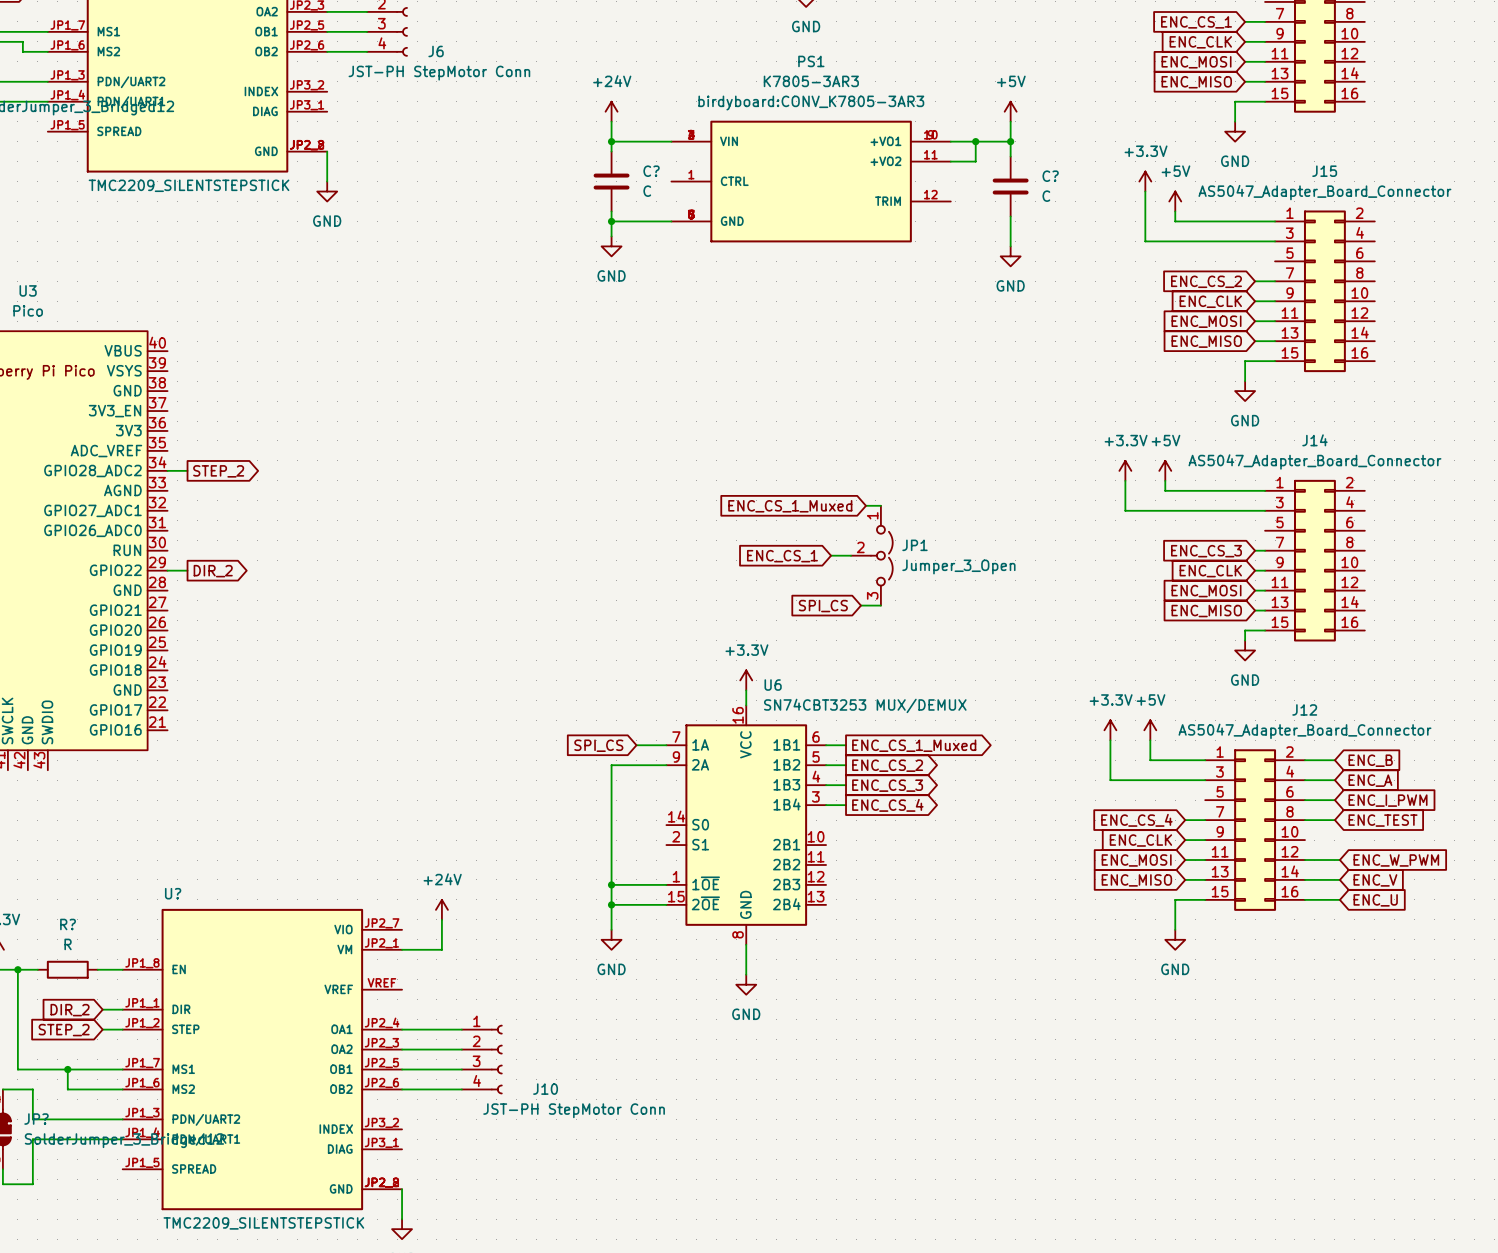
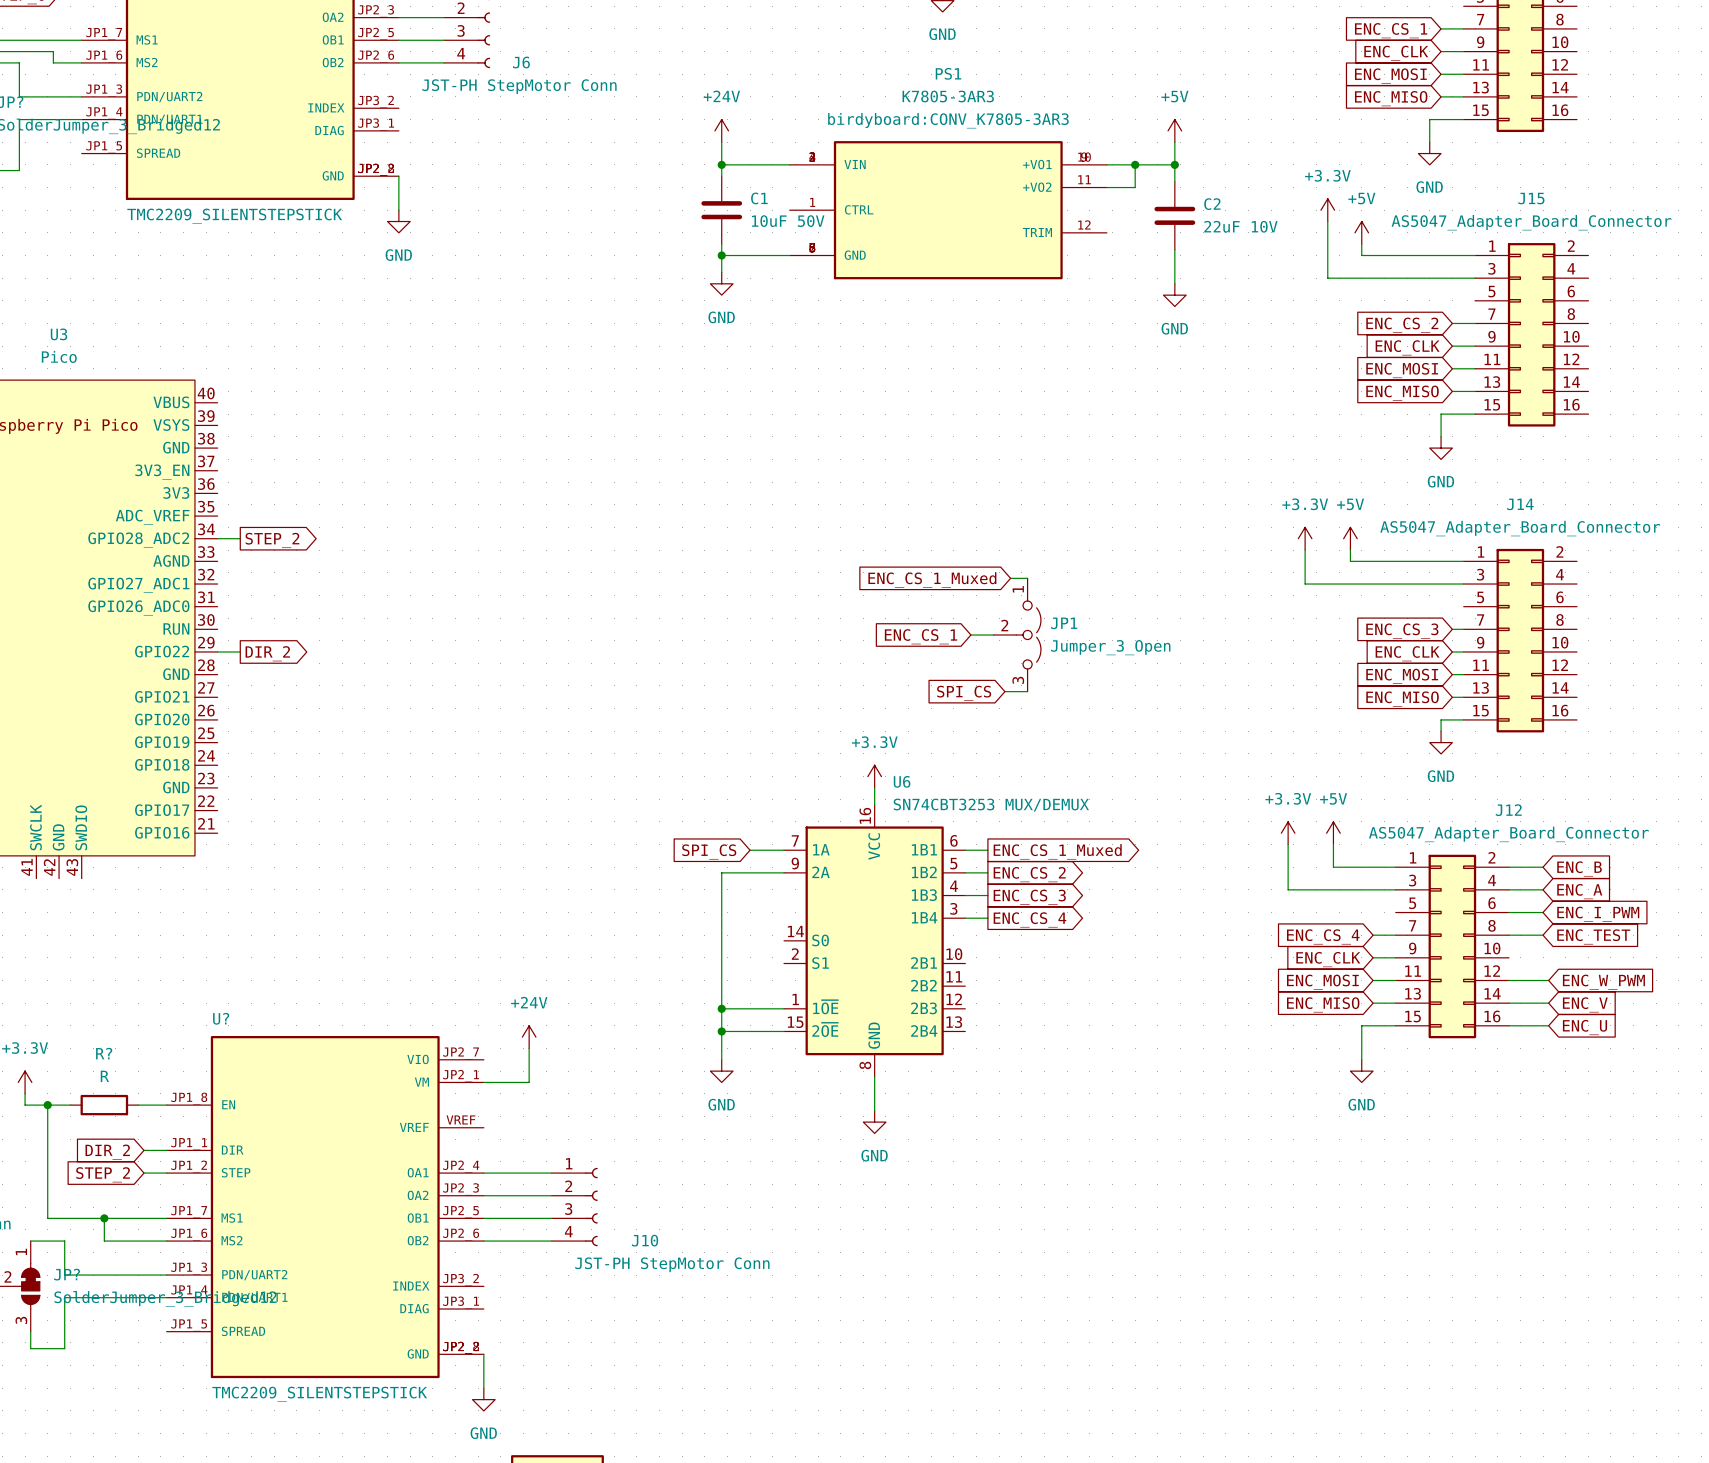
C? name: C? (651, 171) -> C1 (759, 198)
C? name: C? (1050, 176) -> C2 (1212, 204)
C? value: C (647, 191) -> 10uF 50V (788, 221)
C? value: C (1046, 196) -> 22uF 10V (1240, 226)

